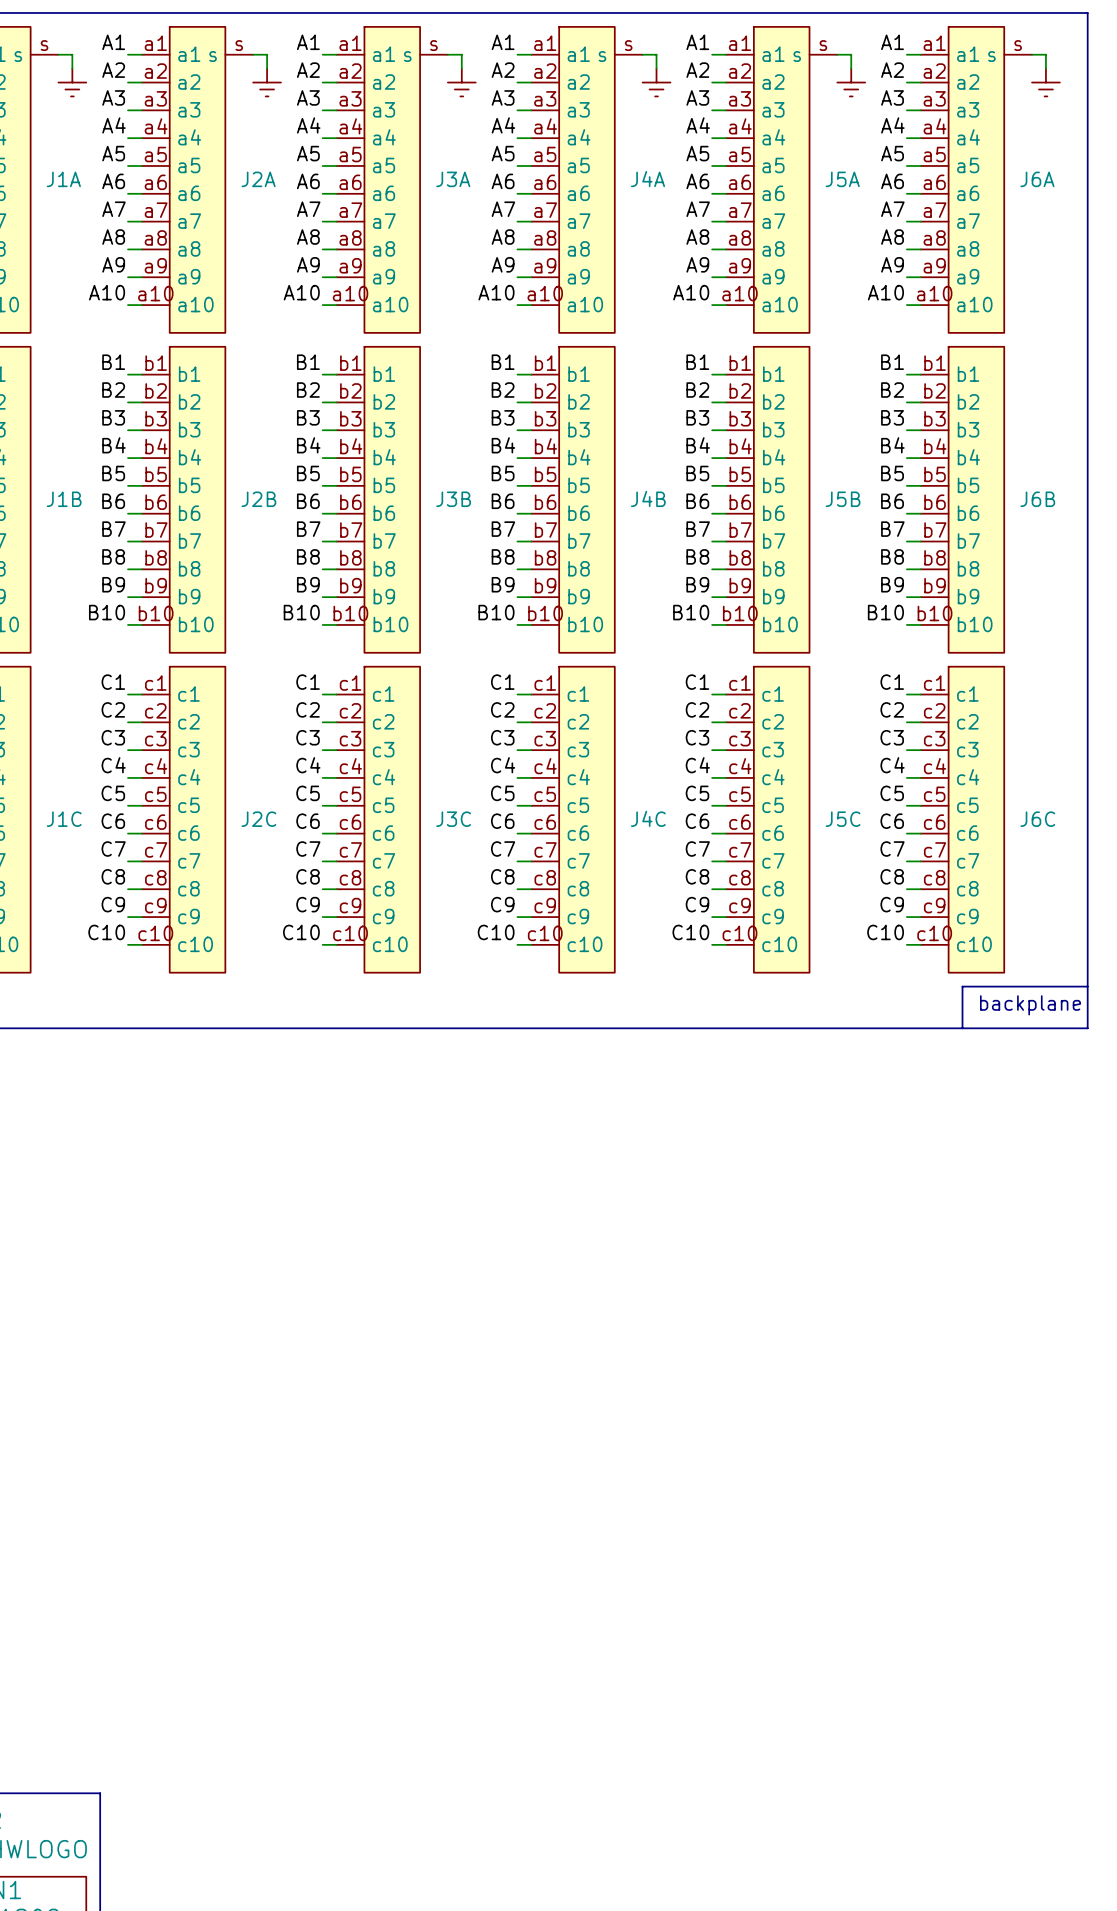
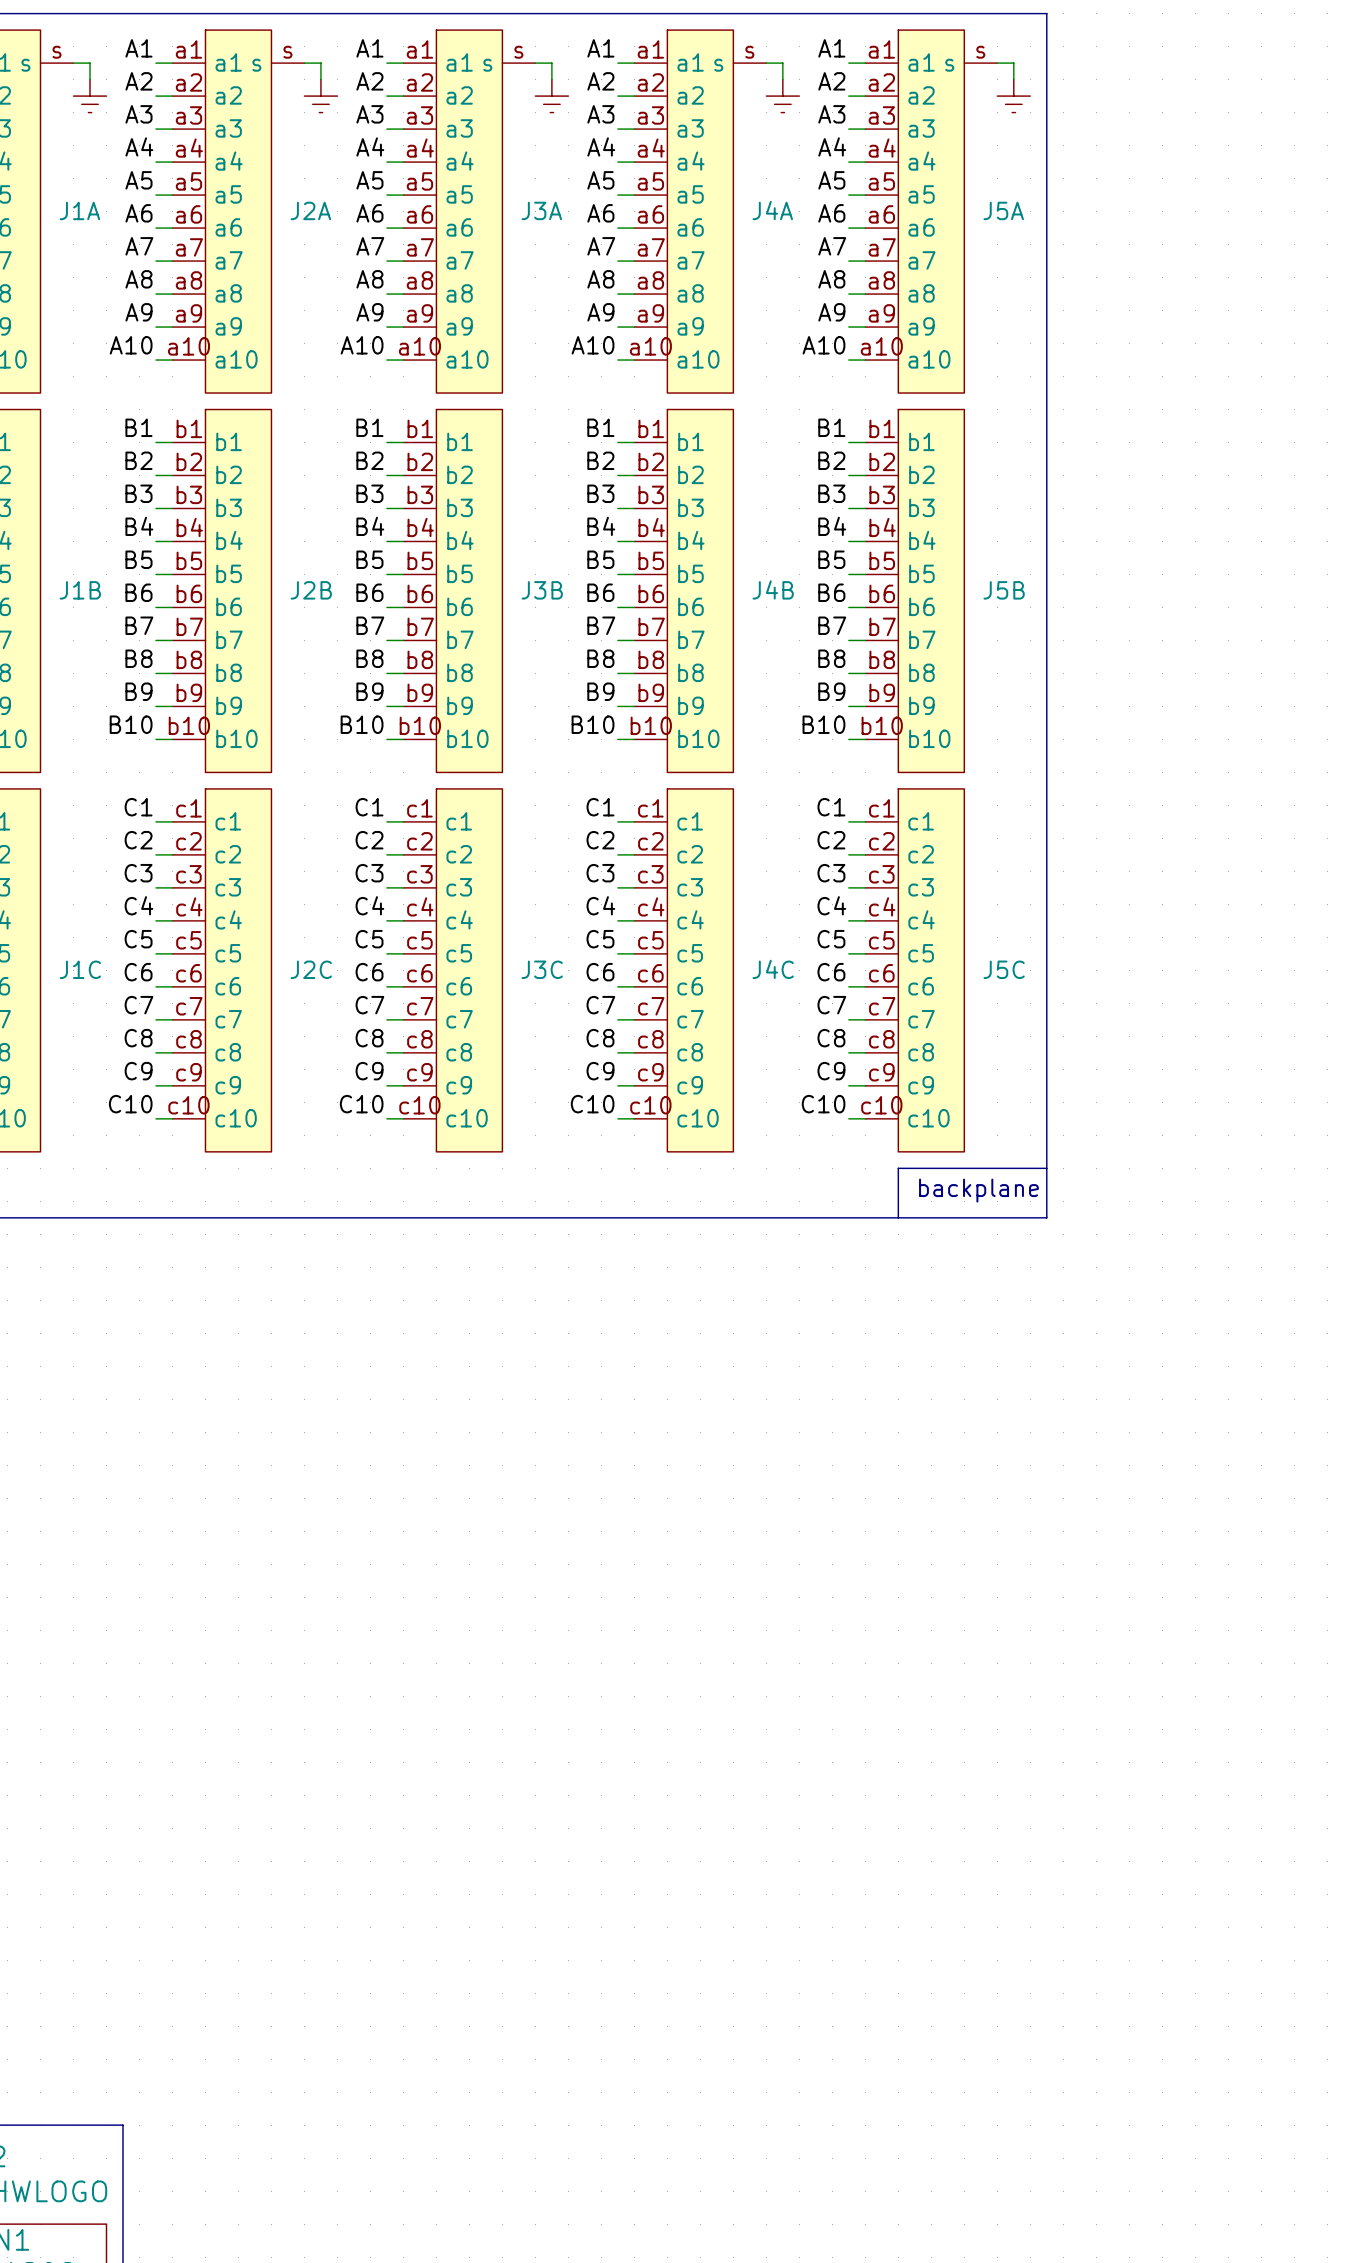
line: (879, 12) (1087, 12) (1087, 1028) (879, 1028) -> (1046, 13) (1046, 1217)
label: A1 (892, 42) -> none
wire: (906, 54) (920, 54) -> none
wire: (1032, 54) (1045, 54) (1045, 68) -> none
label: A2 (892, 70) -> none
wire: (906, 82) (920, 82) -> none
power symbol: (1045, 82) -> none
label: A3 (892, 97) -> none
wire: (906, 110) (920, 110) -> none
label: A4 (892, 125) -> none
wire: (906, 138) (920, 138) -> none
label: A5 (892, 153) -> none
wire: (906, 165) (920, 165) -> none
J6A: (976, 179) -> none
label: A6 (892, 181) -> none
wire: (906, 193) (920, 193) -> none
label: A7 (892, 209) -> none
wire: (906, 221) (920, 221) -> none
label: A8 (892, 237) -> none
wire: (906, 249) (920, 249) -> none
label: A9 (892, 264) -> none
wire: (906, 277) (920, 277) -> none
label: A10 (885, 292) -> none
wire: (906, 305) (920, 305) -> none
label: B1 (892, 362) -> none
wire: (906, 374) (920, 374) -> none
label: B2 (892, 390) -> none
wire: (906, 402) (920, 402) -> none
label: B3 (892, 417) -> none
wire: (906, 430) (920, 430) -> none
label: B4 (892, 445) -> none
wire: (906, 458) (920, 458) -> none
label: B5 (892, 473) -> none
wire: (906, 485) (920, 485) -> none
J6B: (962, 499) -> none
label: B6 (892, 501) -> none
wire: (906, 513) (920, 513) -> none
label: B7 (892, 529) -> none
wire: (906, 541) (920, 541) -> none
label: B8 (892, 556) -> none
wire: (906, 569) (920, 569) -> none
label: B9 (892, 584) -> none
wire: (906, 597) (920, 597) -> none
label: B10 (885, 612) -> none
wire: (906, 624) (920, 624) -> none
label: C1 (892, 682) -> none
wire: (906, 694) (920, 694) -> none
label: C2 (892, 709) -> none
wire: (906, 722) (920, 722) -> none
label: C3 (892, 737) -> none
wire: (906, 750) (920, 750) -> none
label: C4 (892, 765) -> none
wire: (906, 777) (920, 777) -> none
label: C5 (892, 793) -> none
wire: (906, 805) (920, 805) -> none
J6C: (962, 819) -> none
label: C6 (892, 821) -> none
wire: (906, 833) (920, 833) -> none
label: C7 (892, 849) -> none
wire: (906, 861) (920, 861) -> none
label: C8 (892, 876) -> none
wire: (906, 889) (920, 889) -> none
label: C9 (892, 904) -> none
wire: (906, 917) (920, 917) -> none
label: C10 (885, 932) -> none
wire: (906, 944) (920, 944) -> none
line: (1087, 986) (962, 986) (962, 1028) -> (1046, 1168) (898, 1168) (898, 1217)
text position: backplane (1030, 1005) -> backplane (978, 1190)

